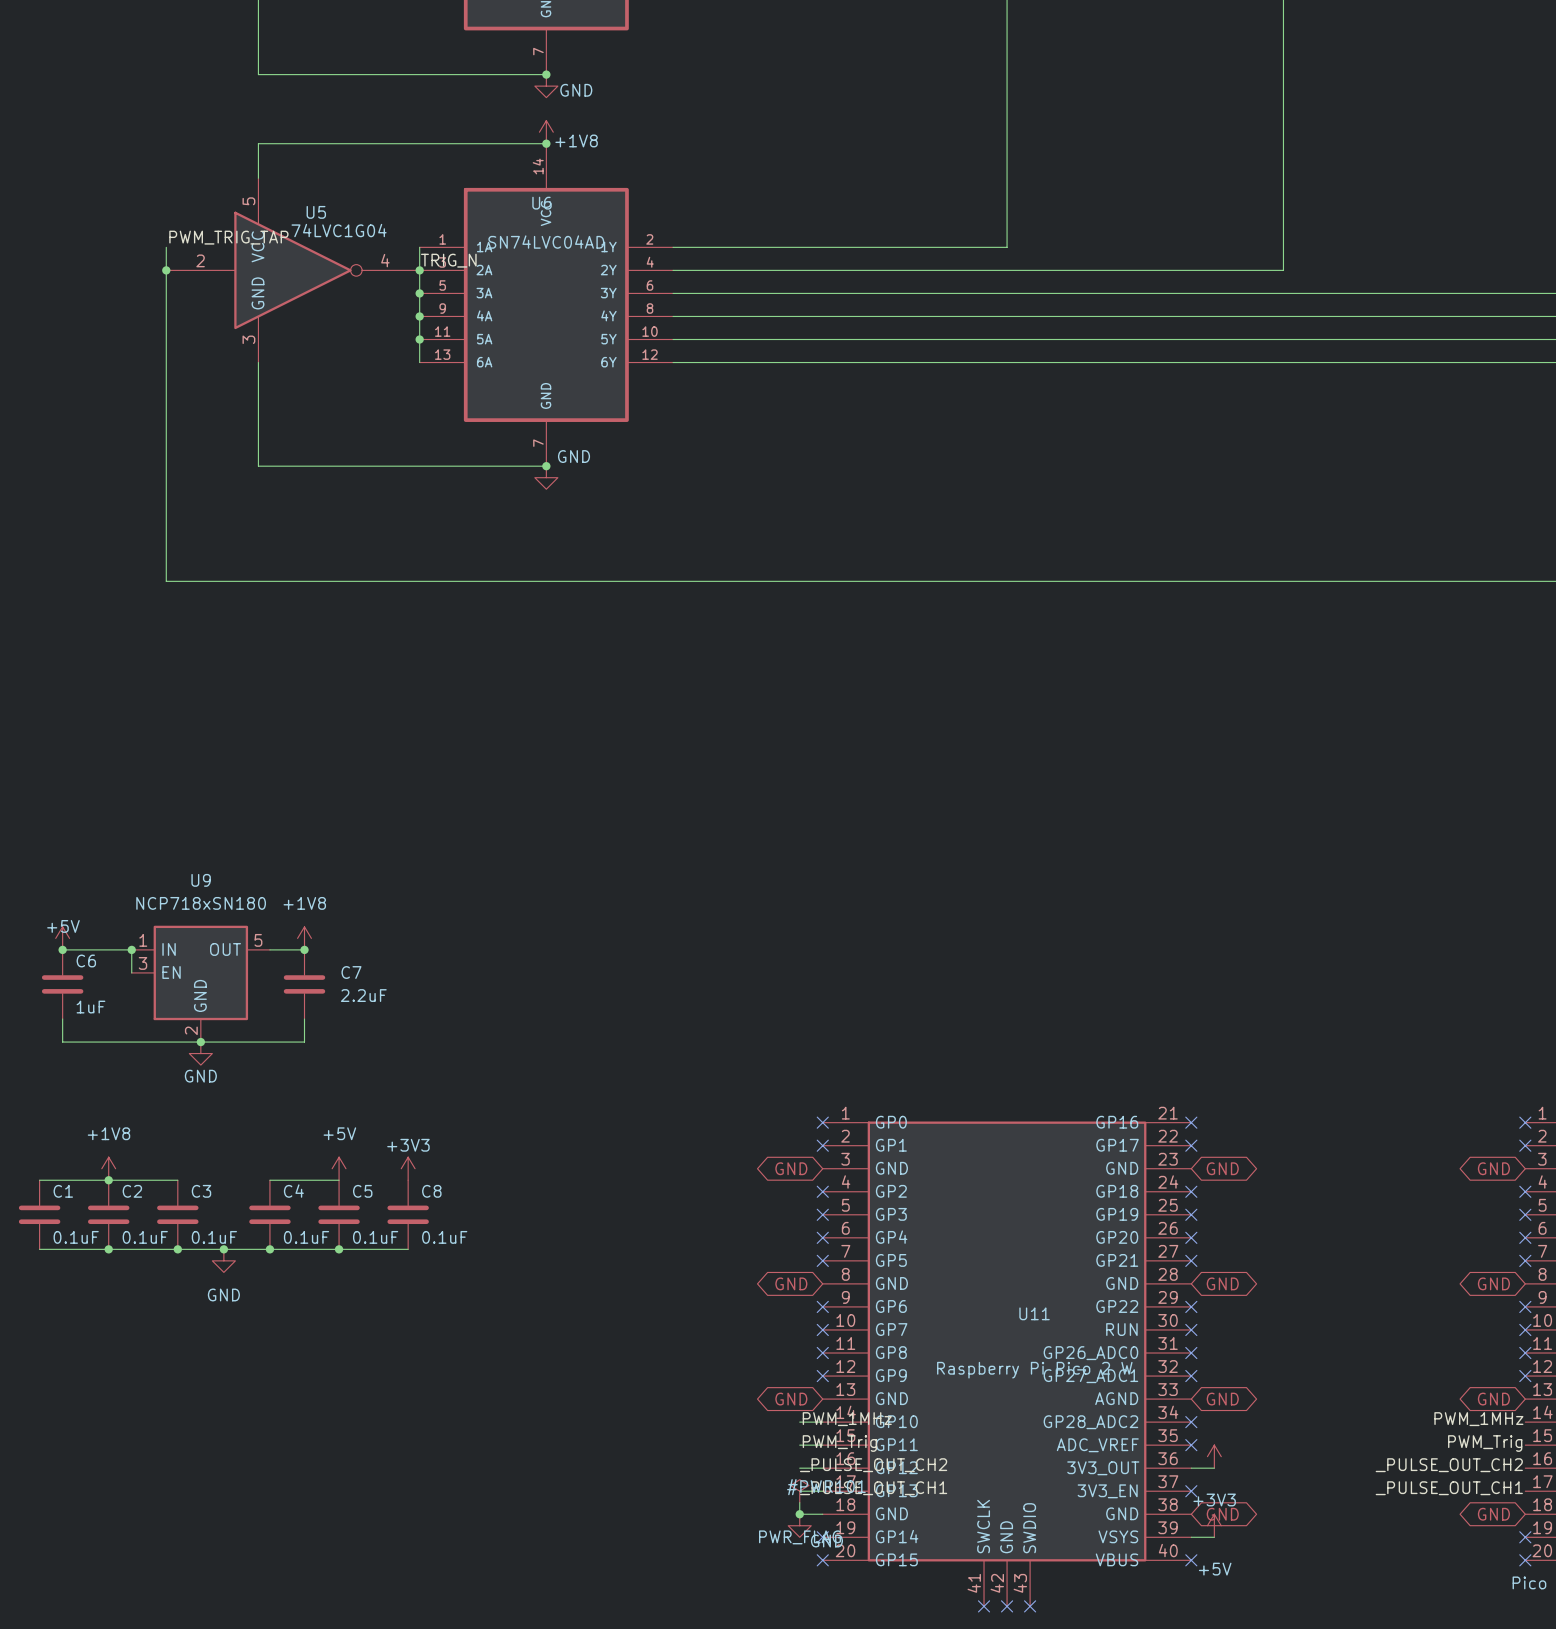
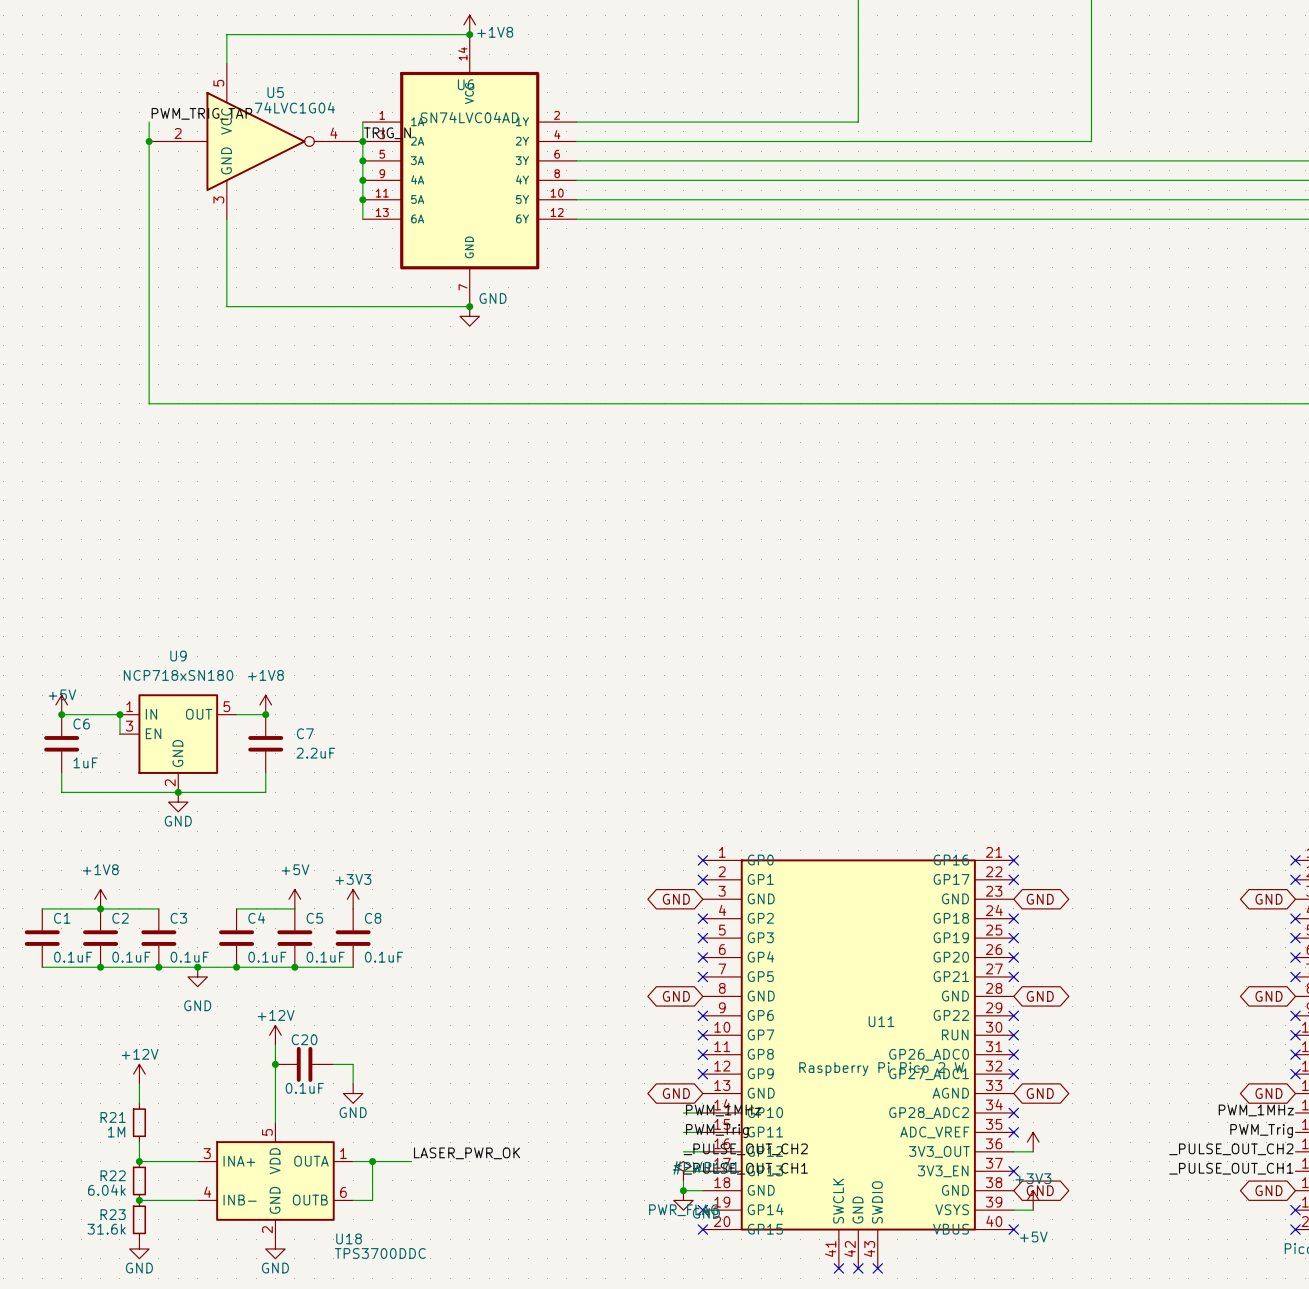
power symbol: none -> +12V (275, 1035)
wire: none -> (275, 1044) (275, 1122)
junction: none -> (275, 1064)
C20: none -> 0.1uF (304, 1064)
wire: none -> (333, 1064) (353, 1064) (353, 1083)
power symbol: none -> +12V (139, 1074)
wire: none -> (139, 1083) (139, 1103)
power symbol: none -> GND (353, 1093)
R21: none -> 1M (139, 1122)
wire: none -> (139, 1142) (139, 1161) (197, 1161)
label: none -> LASER_PWR_OK (467, 1153)
junction: none -> (139, 1161)
wire: none -> (353, 1161) (411, 1161)
wire: none -> (372, 1161) (372, 1200) (353, 1200)
junction: none -> (372, 1161)
R22: none -> 6.04k (139, 1180)
U18: none -> TPS3700DDC (275, 1180)
wire: none -> (139, 1200) (197, 1200)
junction: none -> (139, 1200)
R23: none -> 31.6k (139, 1219)
power symbol: none -> GND (139, 1248)
power symbol: none -> GND (275, 1248)

